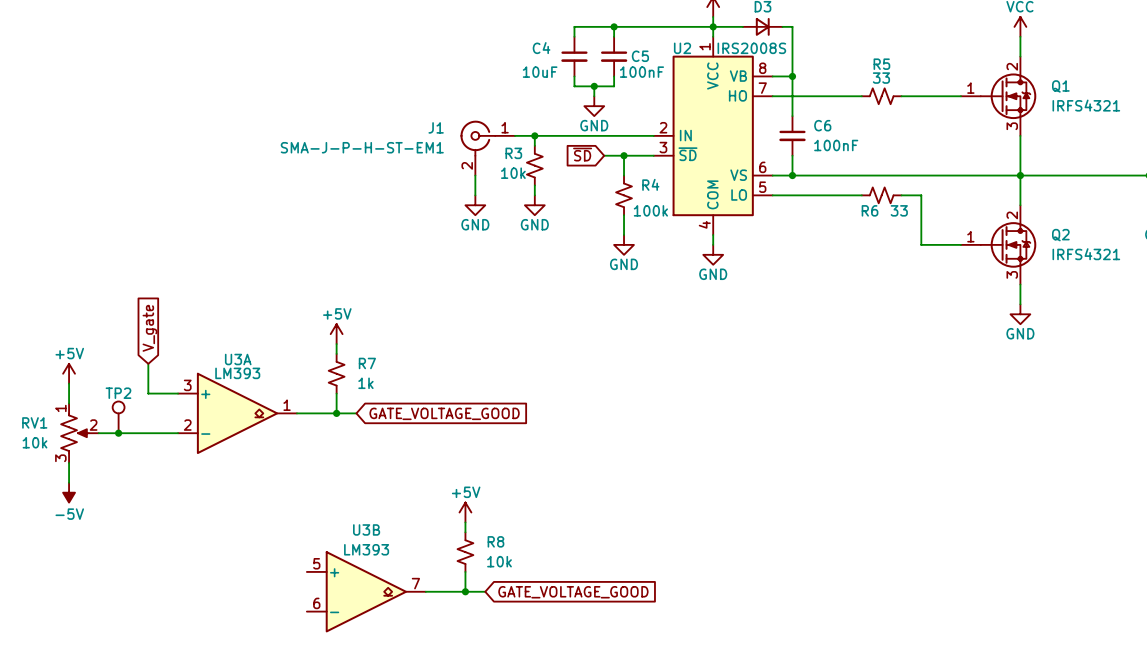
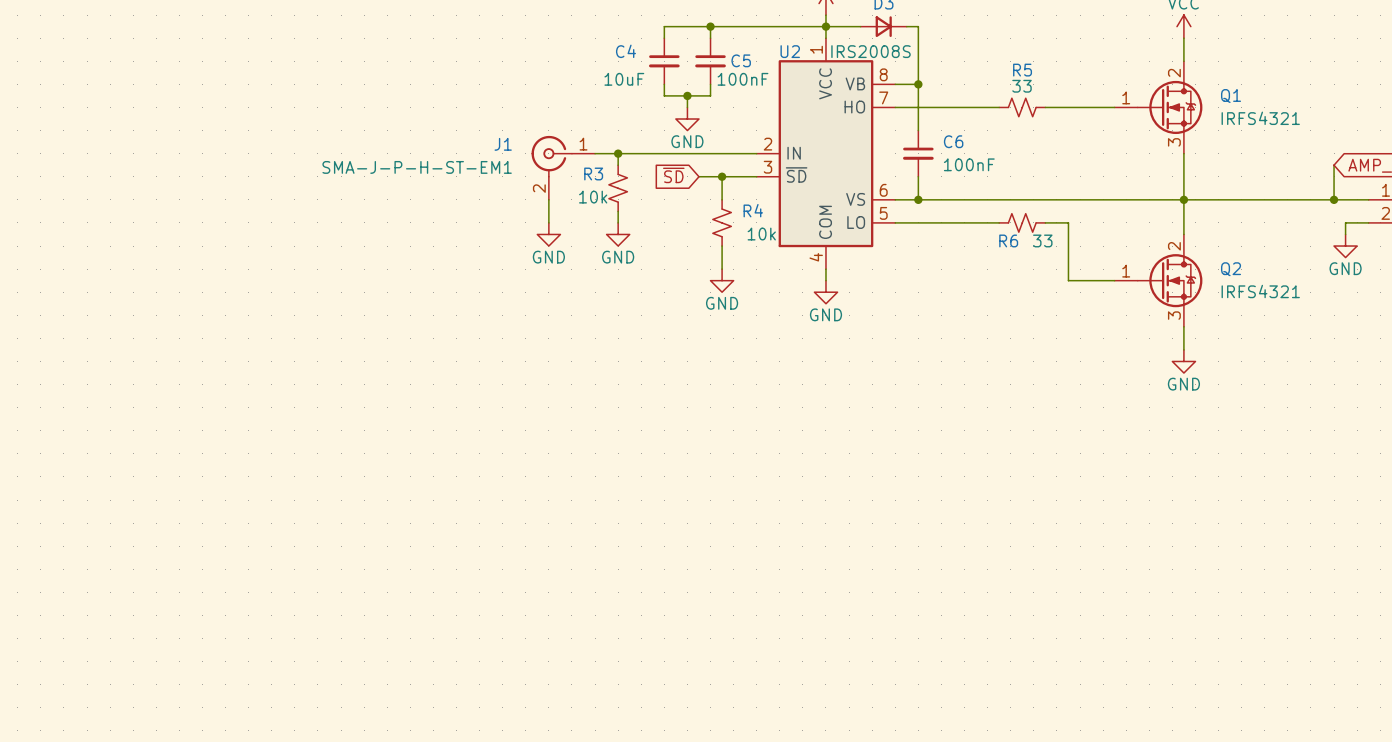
R4 value: 100k (650, 210) -> 10k (761, 234)
global label: V_gate (149, 328) -> none
power symbol: +5V (336, 334) -> none
wire: (336, 344) (336, 353) -> none
wire: (148, 363) (148, 393) (178, 393) -> none
power symbol: +5V (69, 373) -> none
R7: 1k (336, 373) -> none
wire: (69, 383) (69, 403) -> none
wire: (336, 393) (336, 413) -> none
U3A: LM393 (237, 413) -> none
wire: (296, 413) (356, 413) -> none
junction: (336, 413) -> none
global label: GATE_VOLTAGE_GOOD (444, 413) -> none
TP2: (118, 417) -> none
RV1: 10k (79, 433) -> none
wire: (98, 433) (178, 433) -> none
junction: (118, 433) -> none
wire: (69, 462) (69, 482) -> none
power symbol: -5V (69, 492) -> none
power symbol: +5V (465, 512) -> none
wire: (465, 522) (465, 532) -> none
R8: 10k (465, 552) -> none
wire: (465, 571) (465, 591) -> none
U3B: LM393 (366, 591) -> none
wire: (425, 591) (485, 591) -> none
junction: (465, 591) -> none
global label: GATE_VOLTAGE_GOOD (573, 592) -> none

